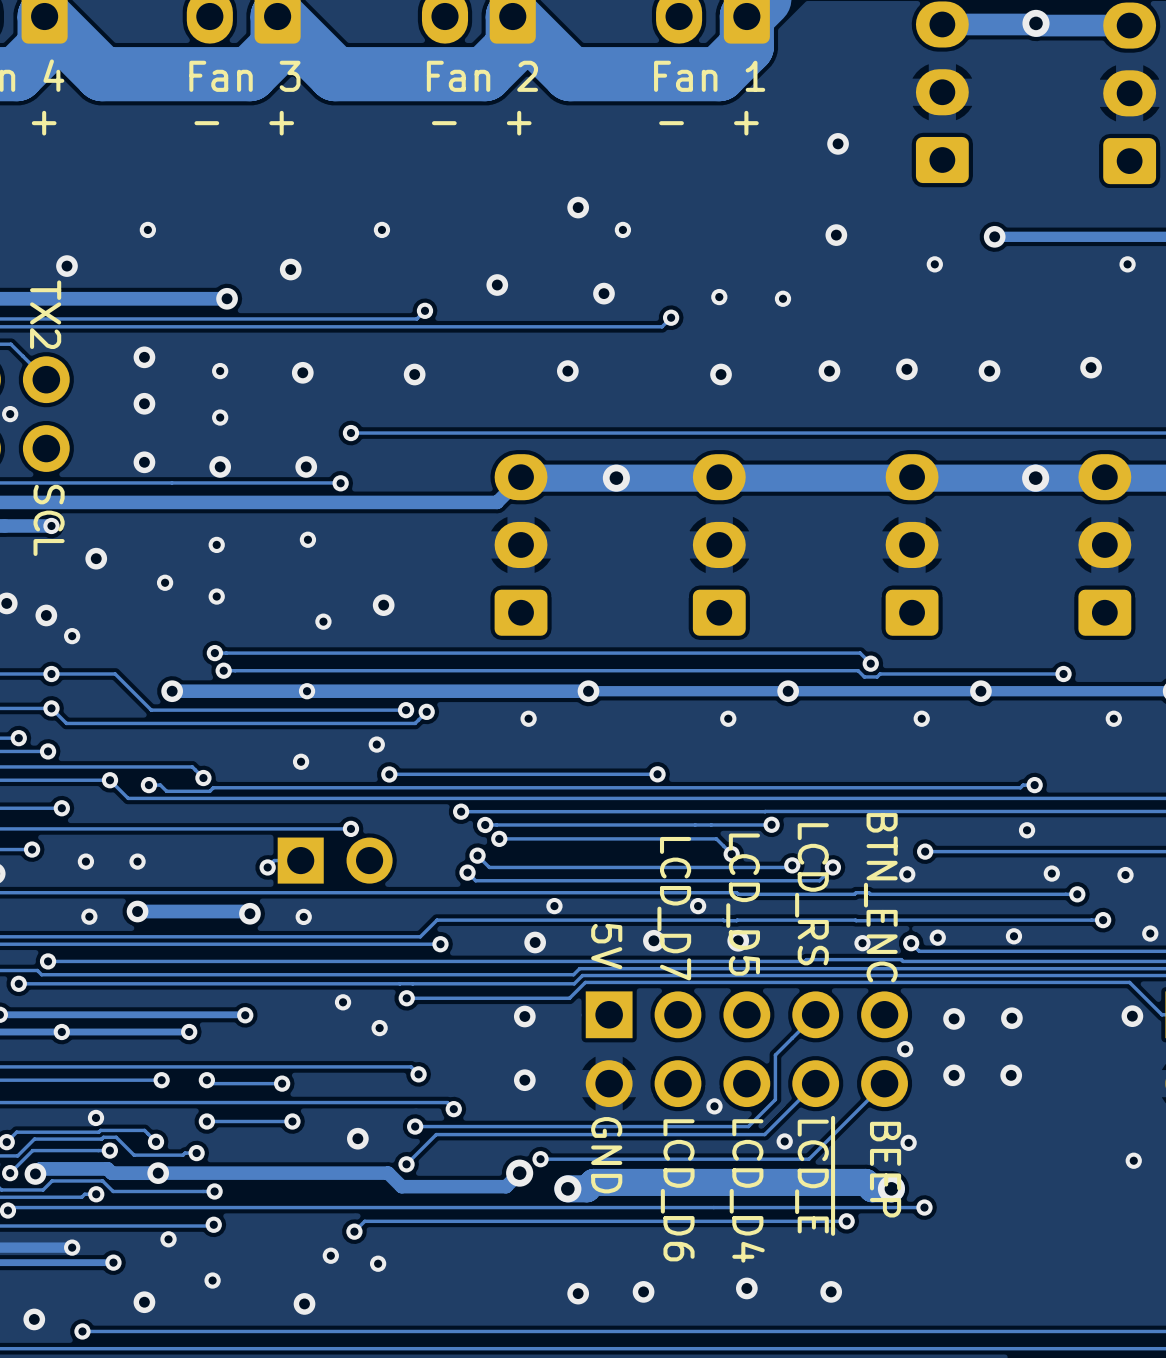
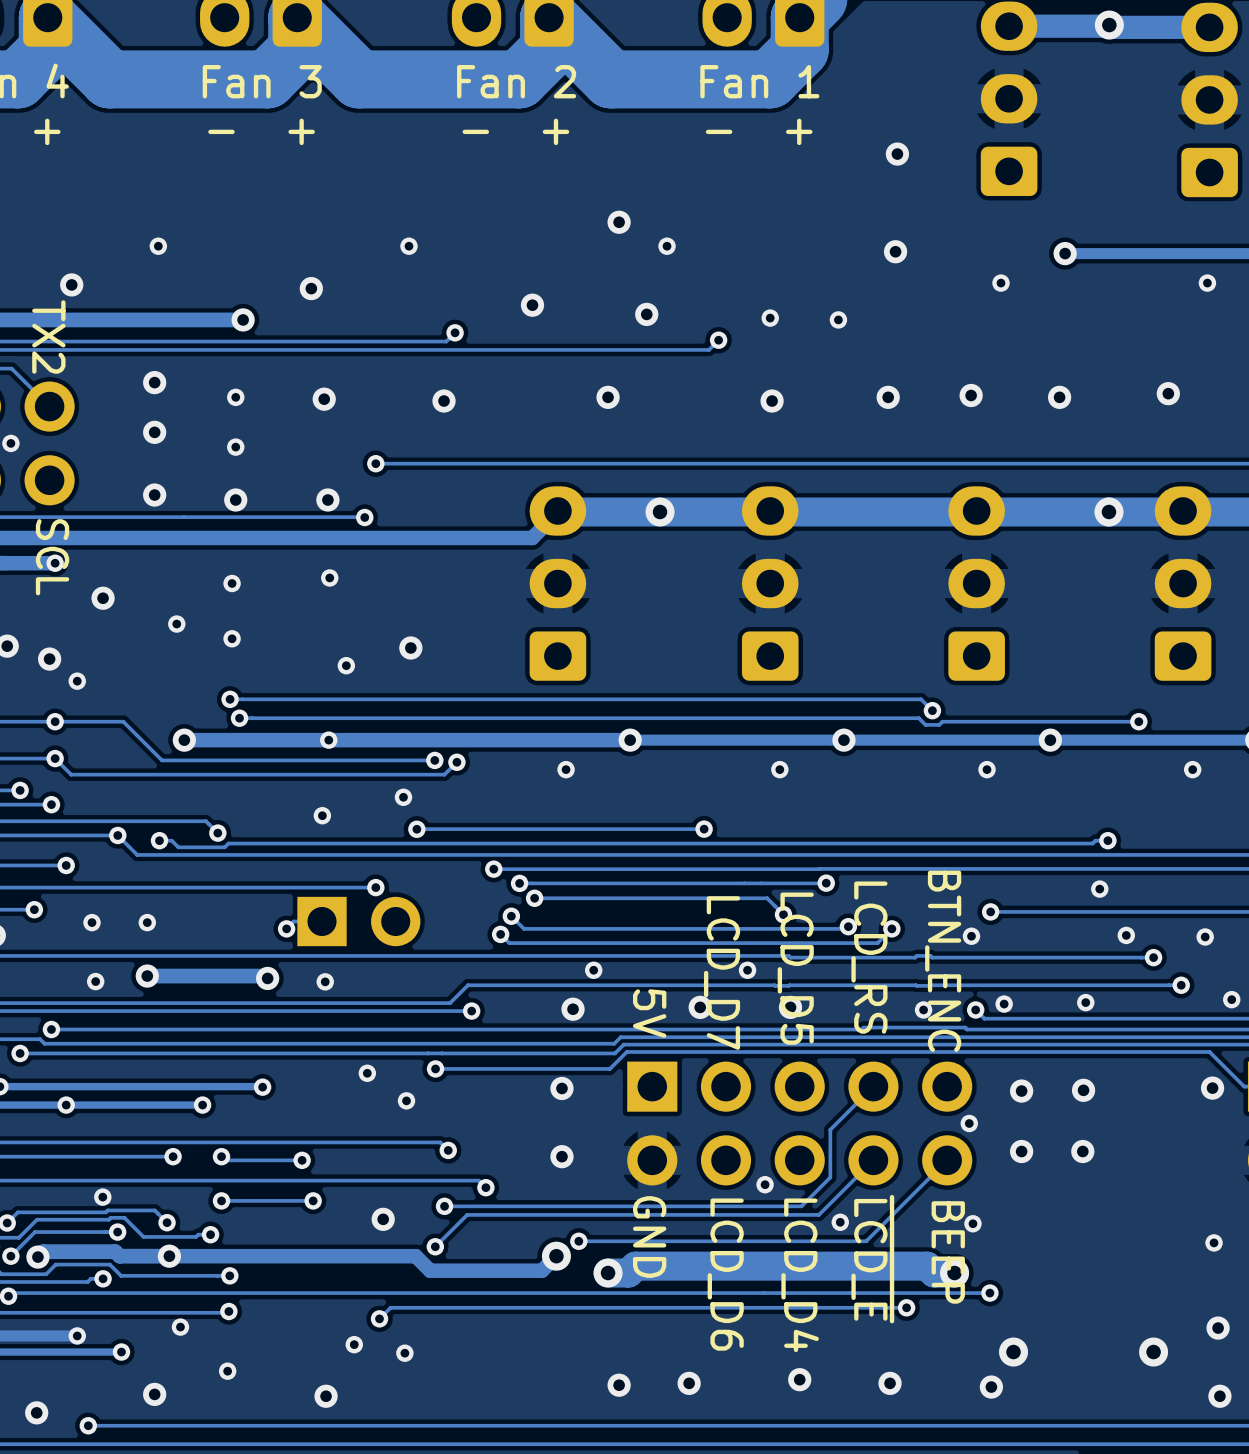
via: none -> (1218, 1328)
via: none -> (1013, 1352)
via: none -> (1153, 1352)
via: none -> (991, 1387)
via: none -> (1219, 1396)

